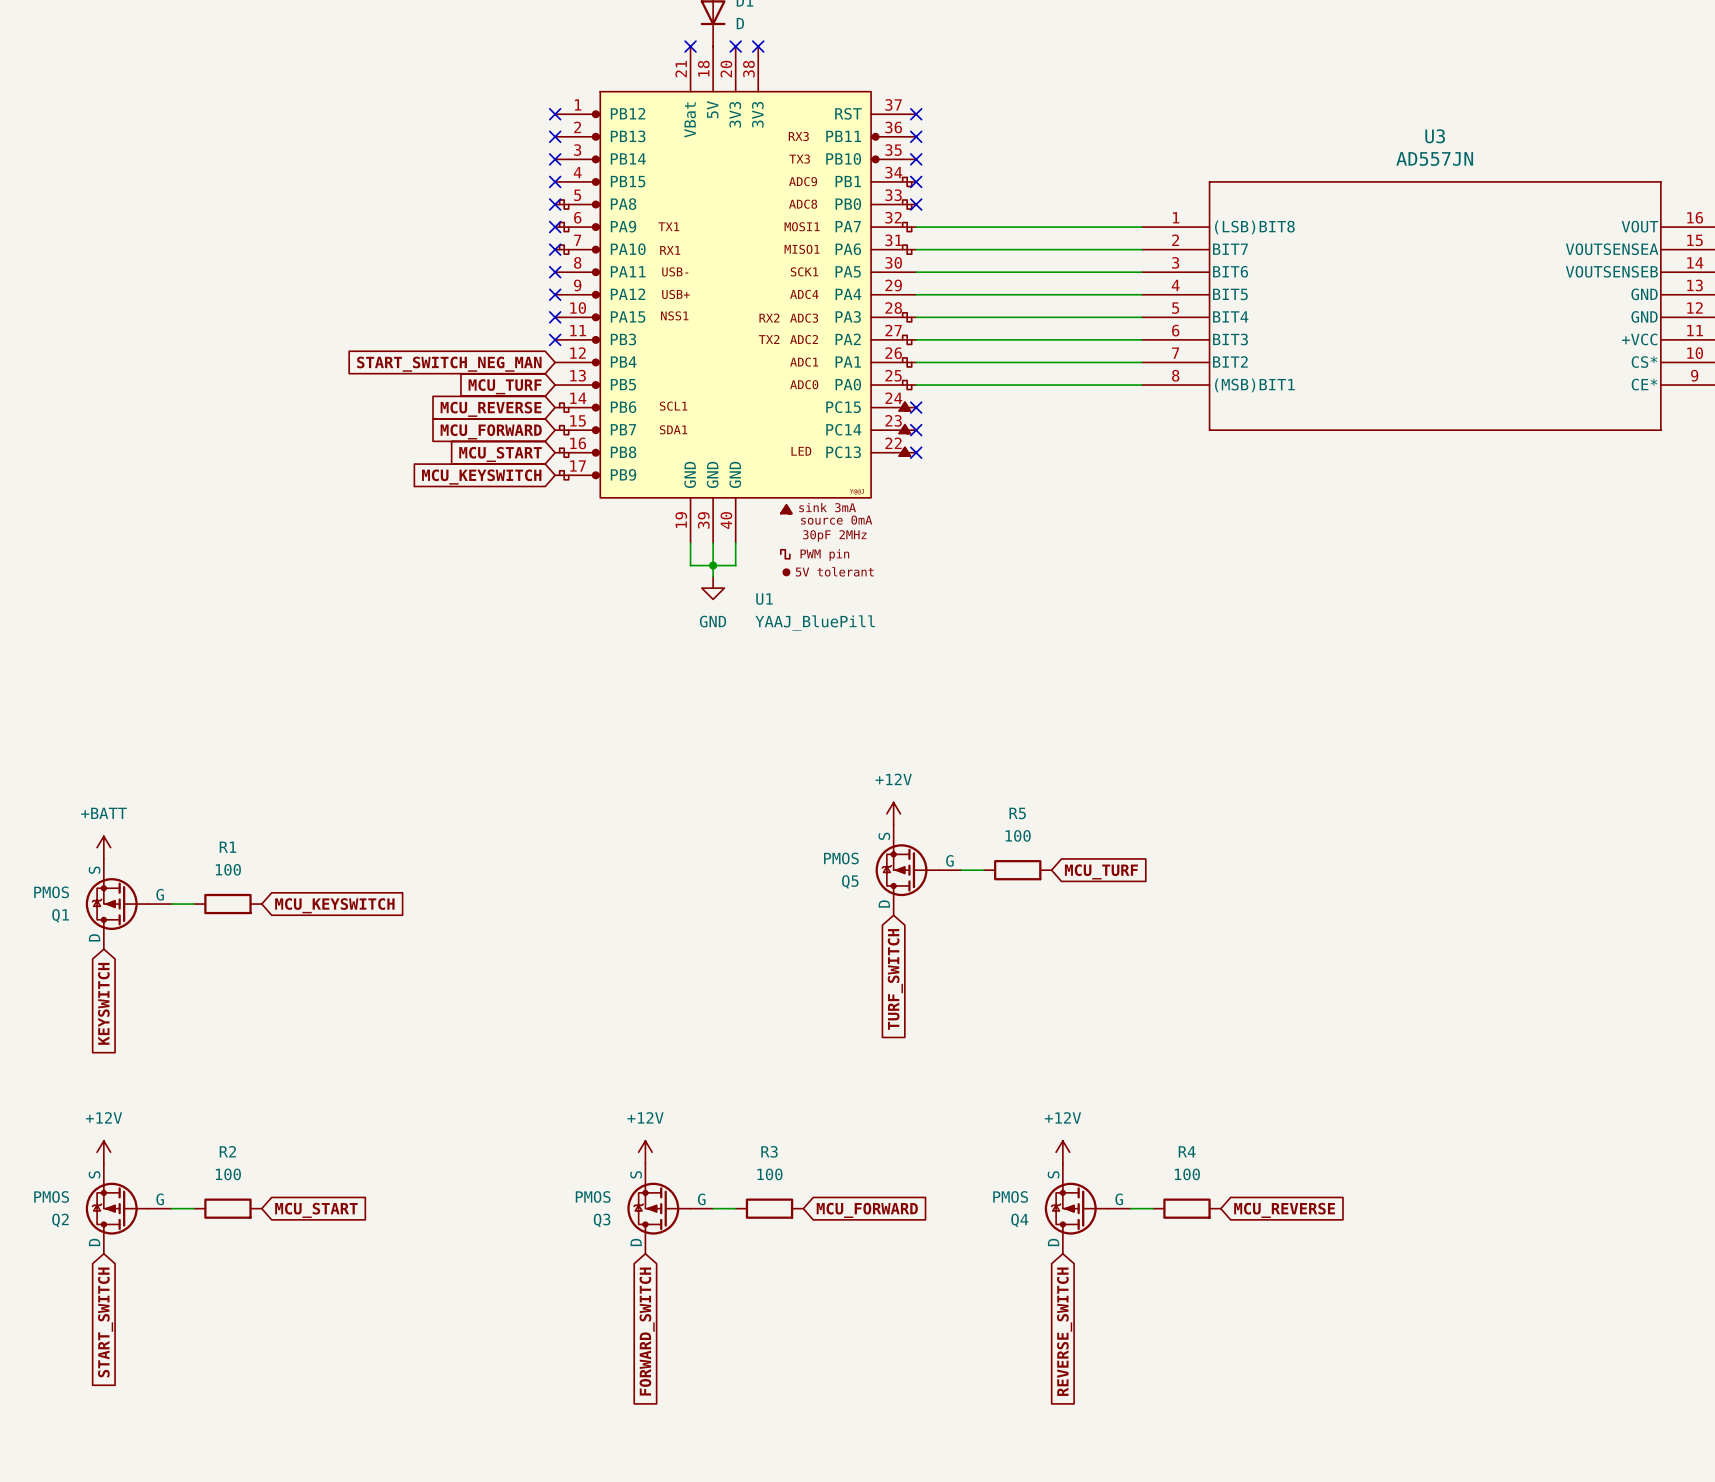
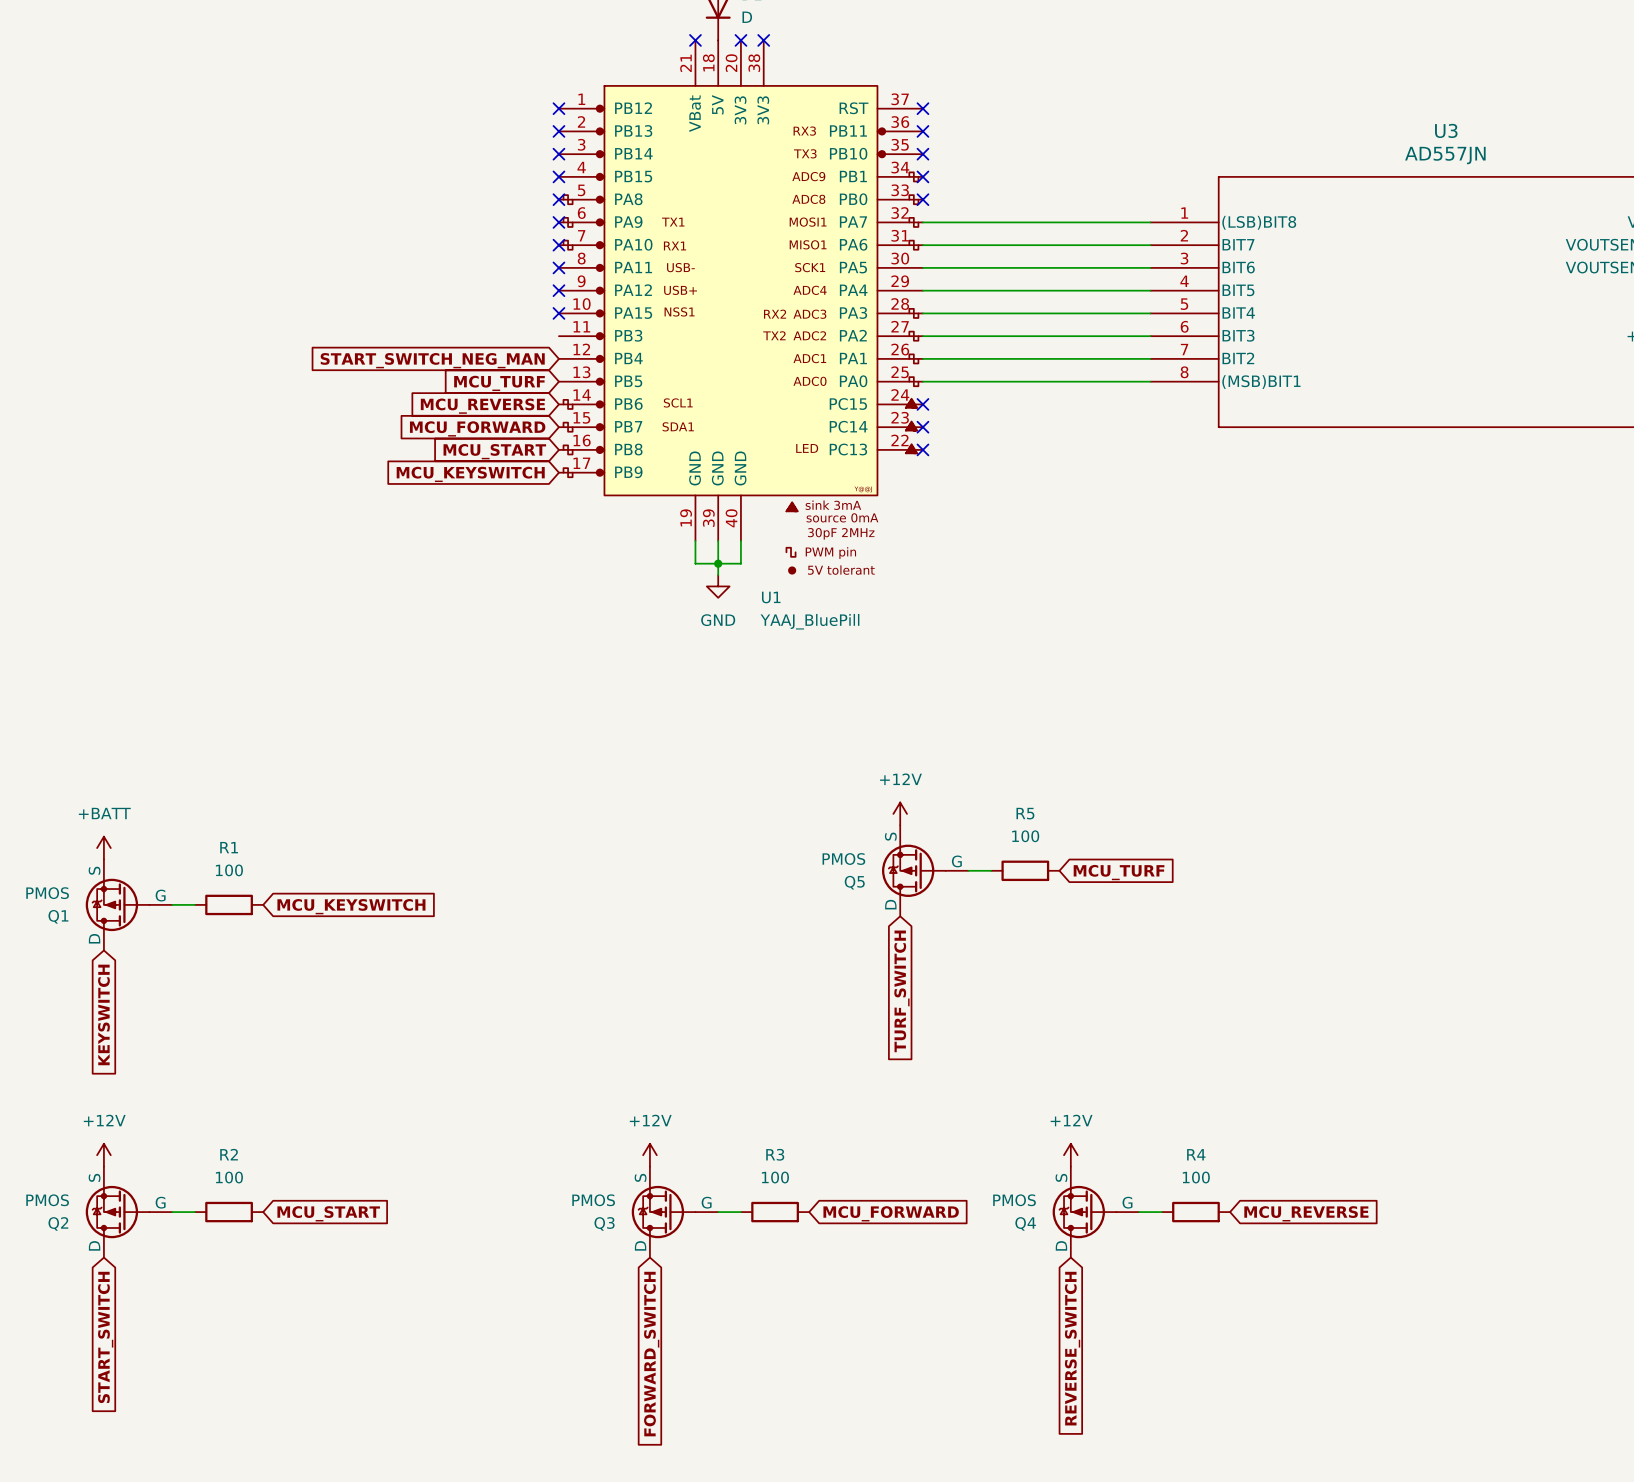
no-connect mark: (555, 339) -> none

